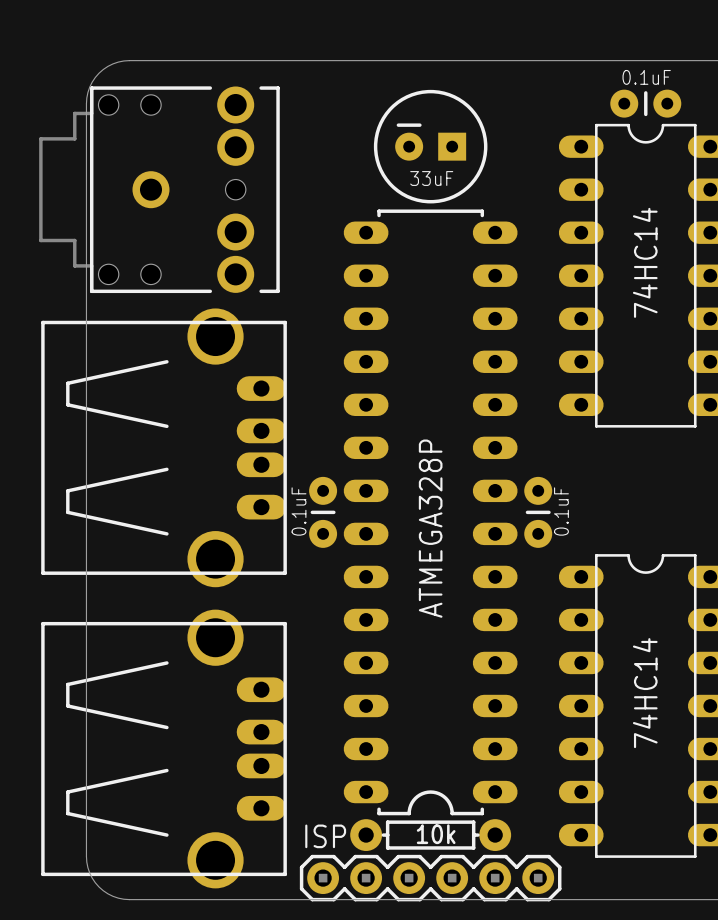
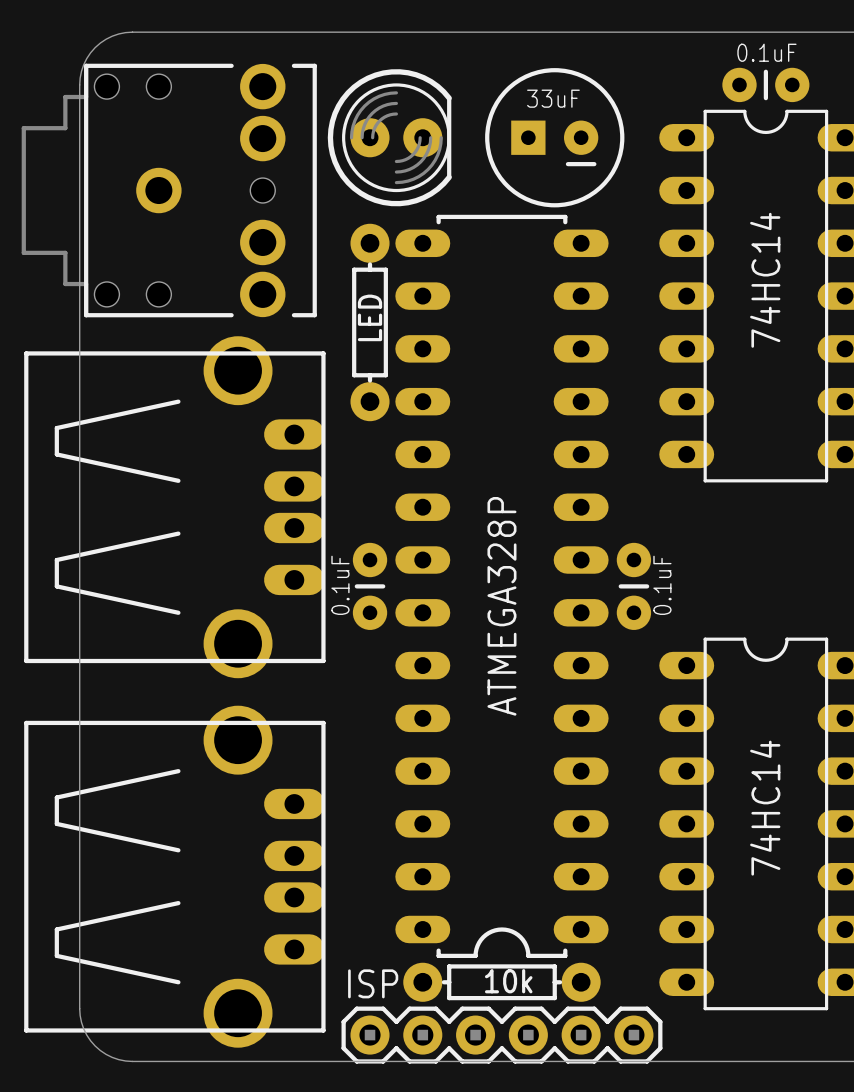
part: none -> (389, 137)
part rotation: 0° (430, 146) -> 180° (554, 137)
part: none -> LED (370, 322)

